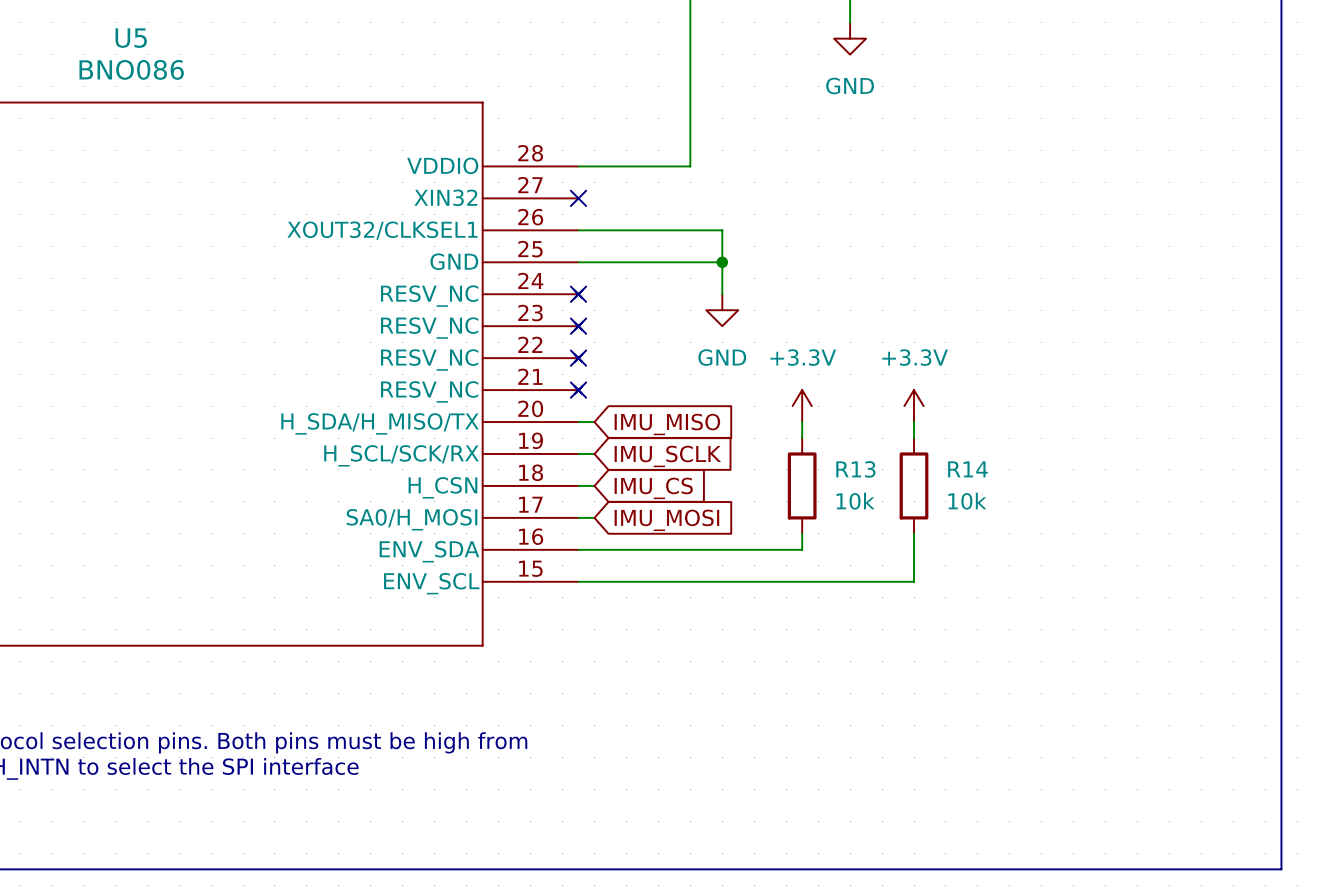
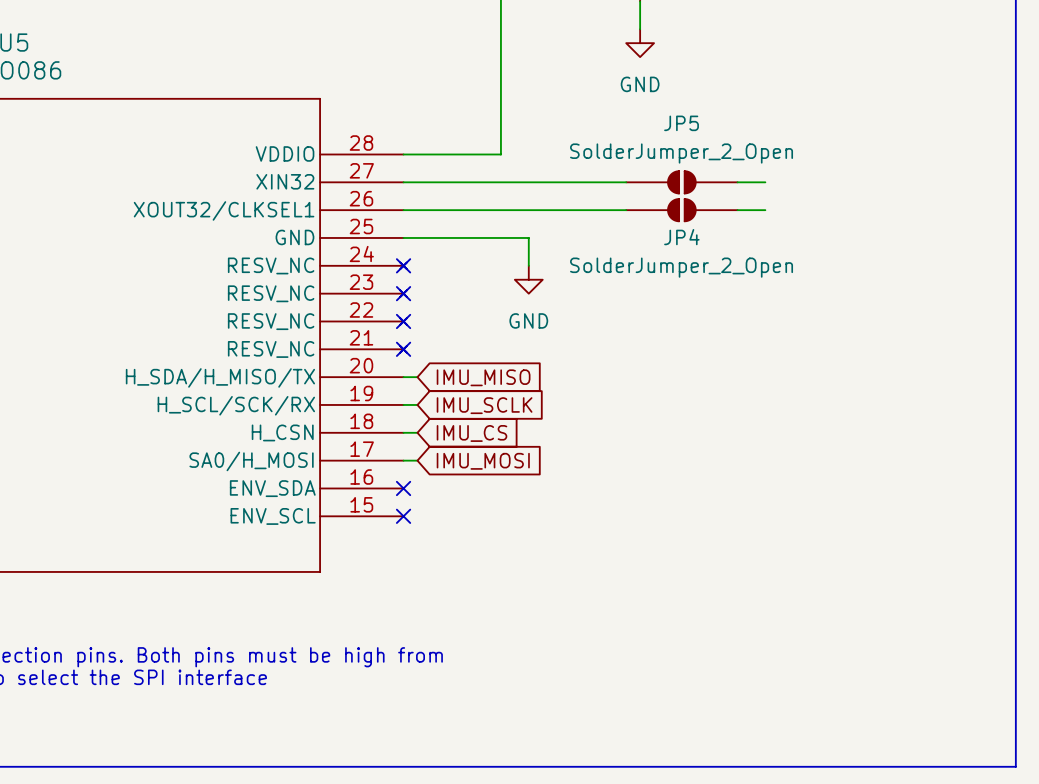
wire: none -> (403, 182) (626, 182)
no-connect mark: (578, 198) -> none
JP5: none -> SolderJumper_2_Open (681, 182)
wire: none -> (737, 182) (765, 182)
wire: (722, 230) (722, 262) -> (528, 210) (626, 210)
JP4: none -> SolderJumper_2_Open (681, 210)
wire: none -> (737, 210) (765, 210)
junction: (722, 262) -> none
power symbol: +3.3V (802, 406) -> none
power symbol: +3.3V (914, 406) -> none
wire: (802, 422) (802, 438) -> none
wire: (914, 422) (914, 438) -> none
R13: 10k (802, 485) -> none
R14: 10k (914, 485) -> none
wire: (802, 533) (802, 549) (578, 549) -> none
wire: (914, 533) (914, 581) (578, 581) -> none
no-connect mark: none -> (403, 488)
no-connect mark: none -> (403, 516)

